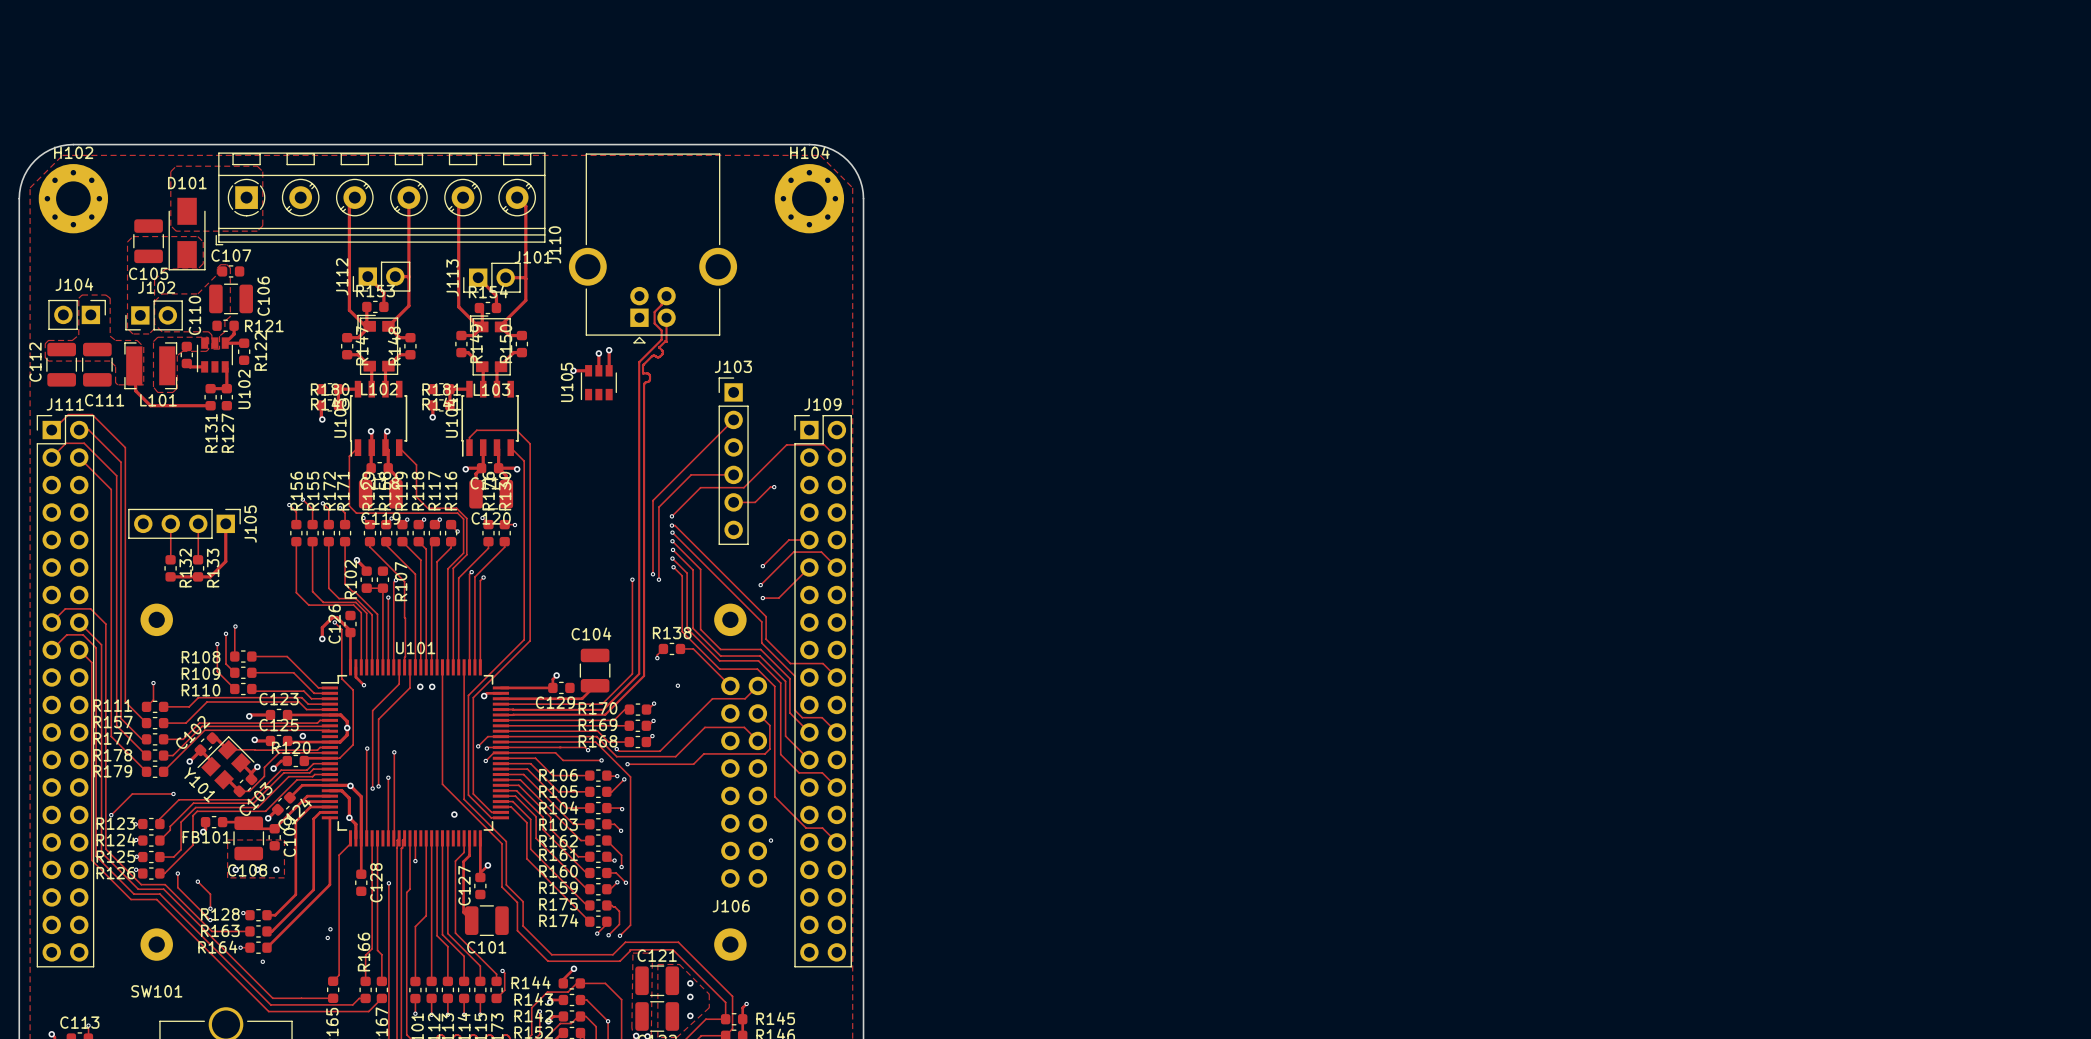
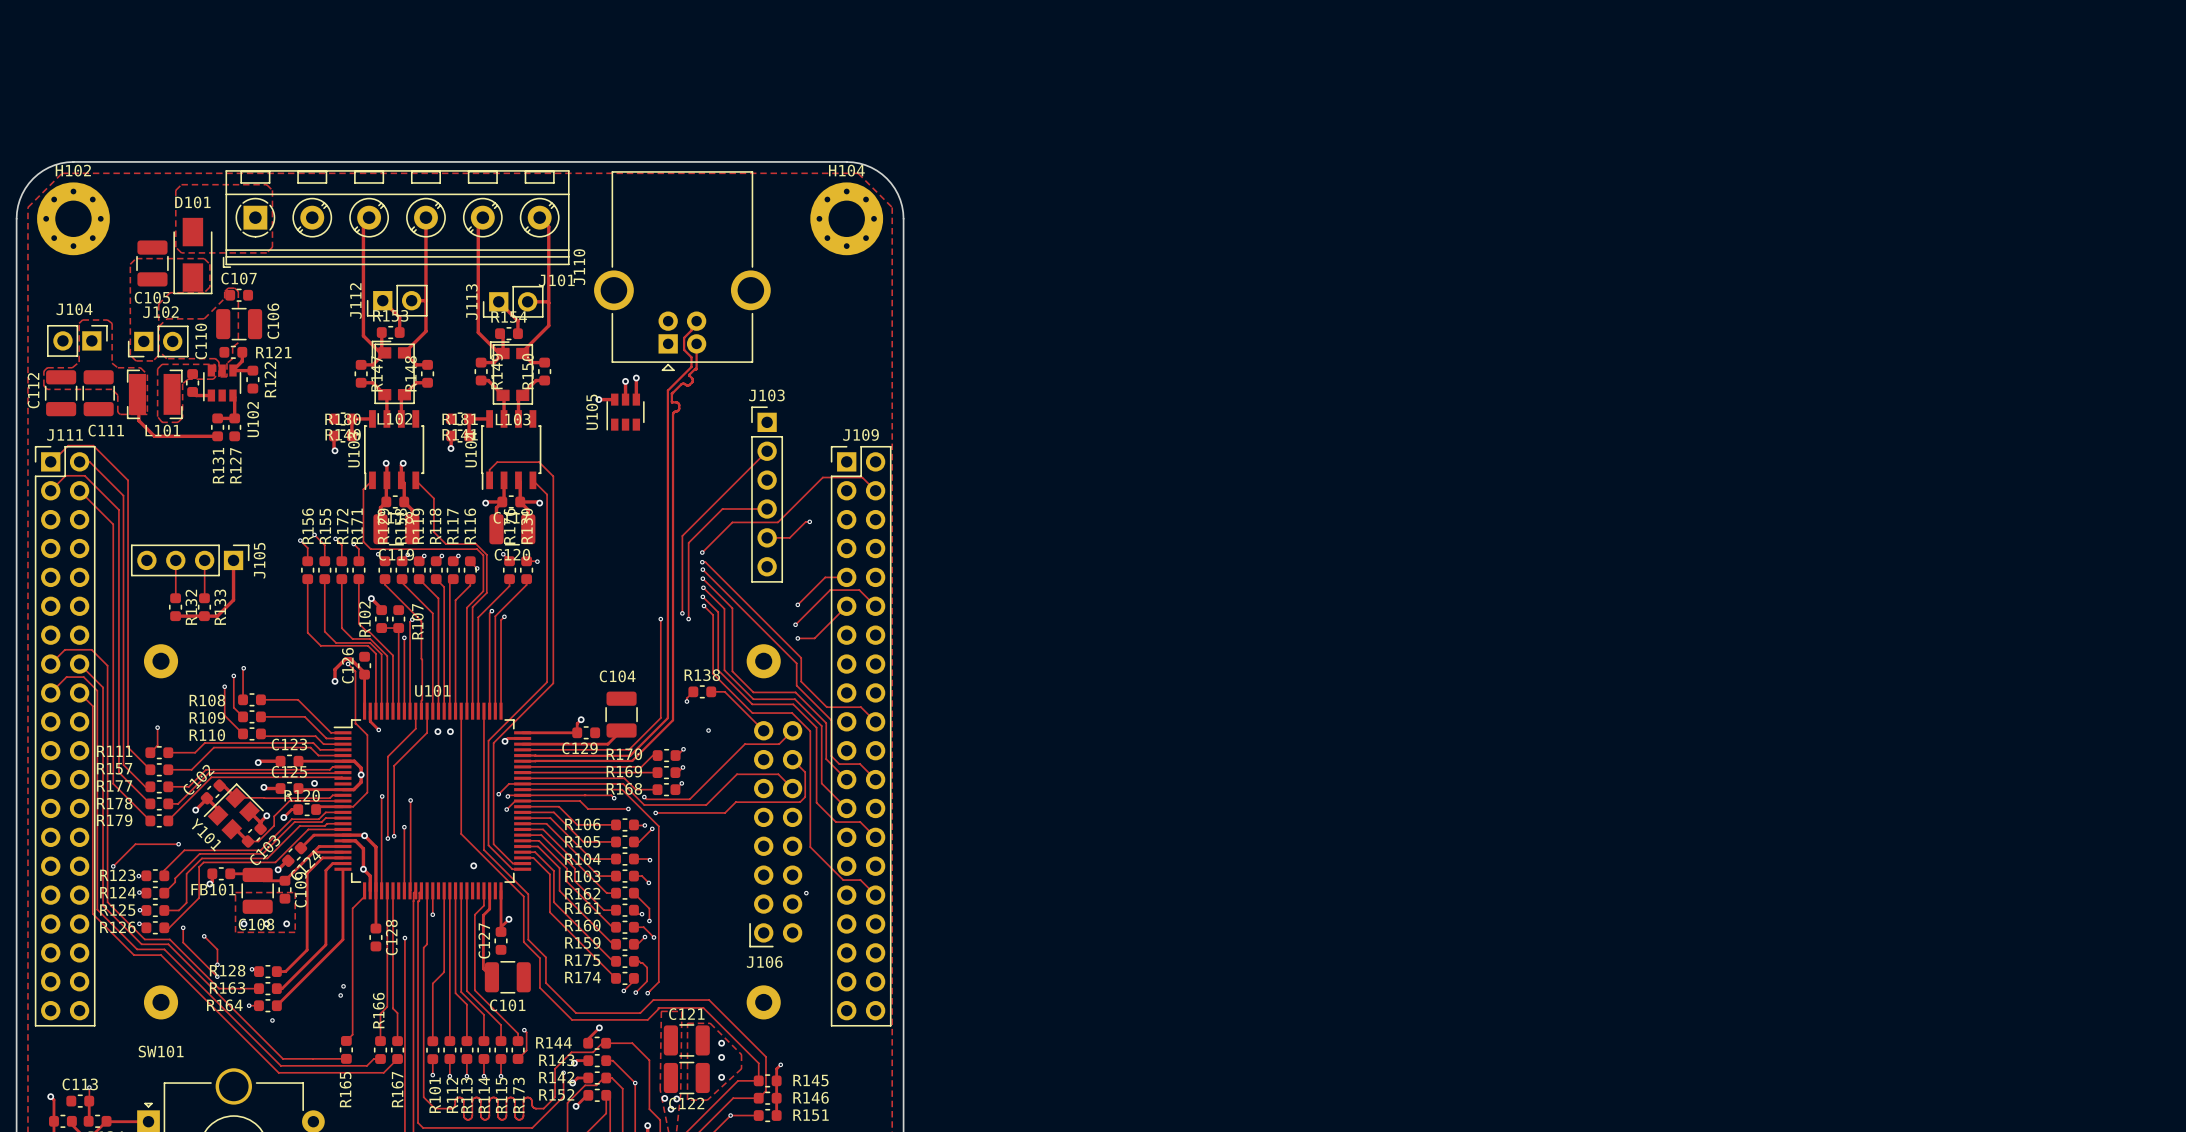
line: none -> (750, 923) (750, 946) (772, 946)

